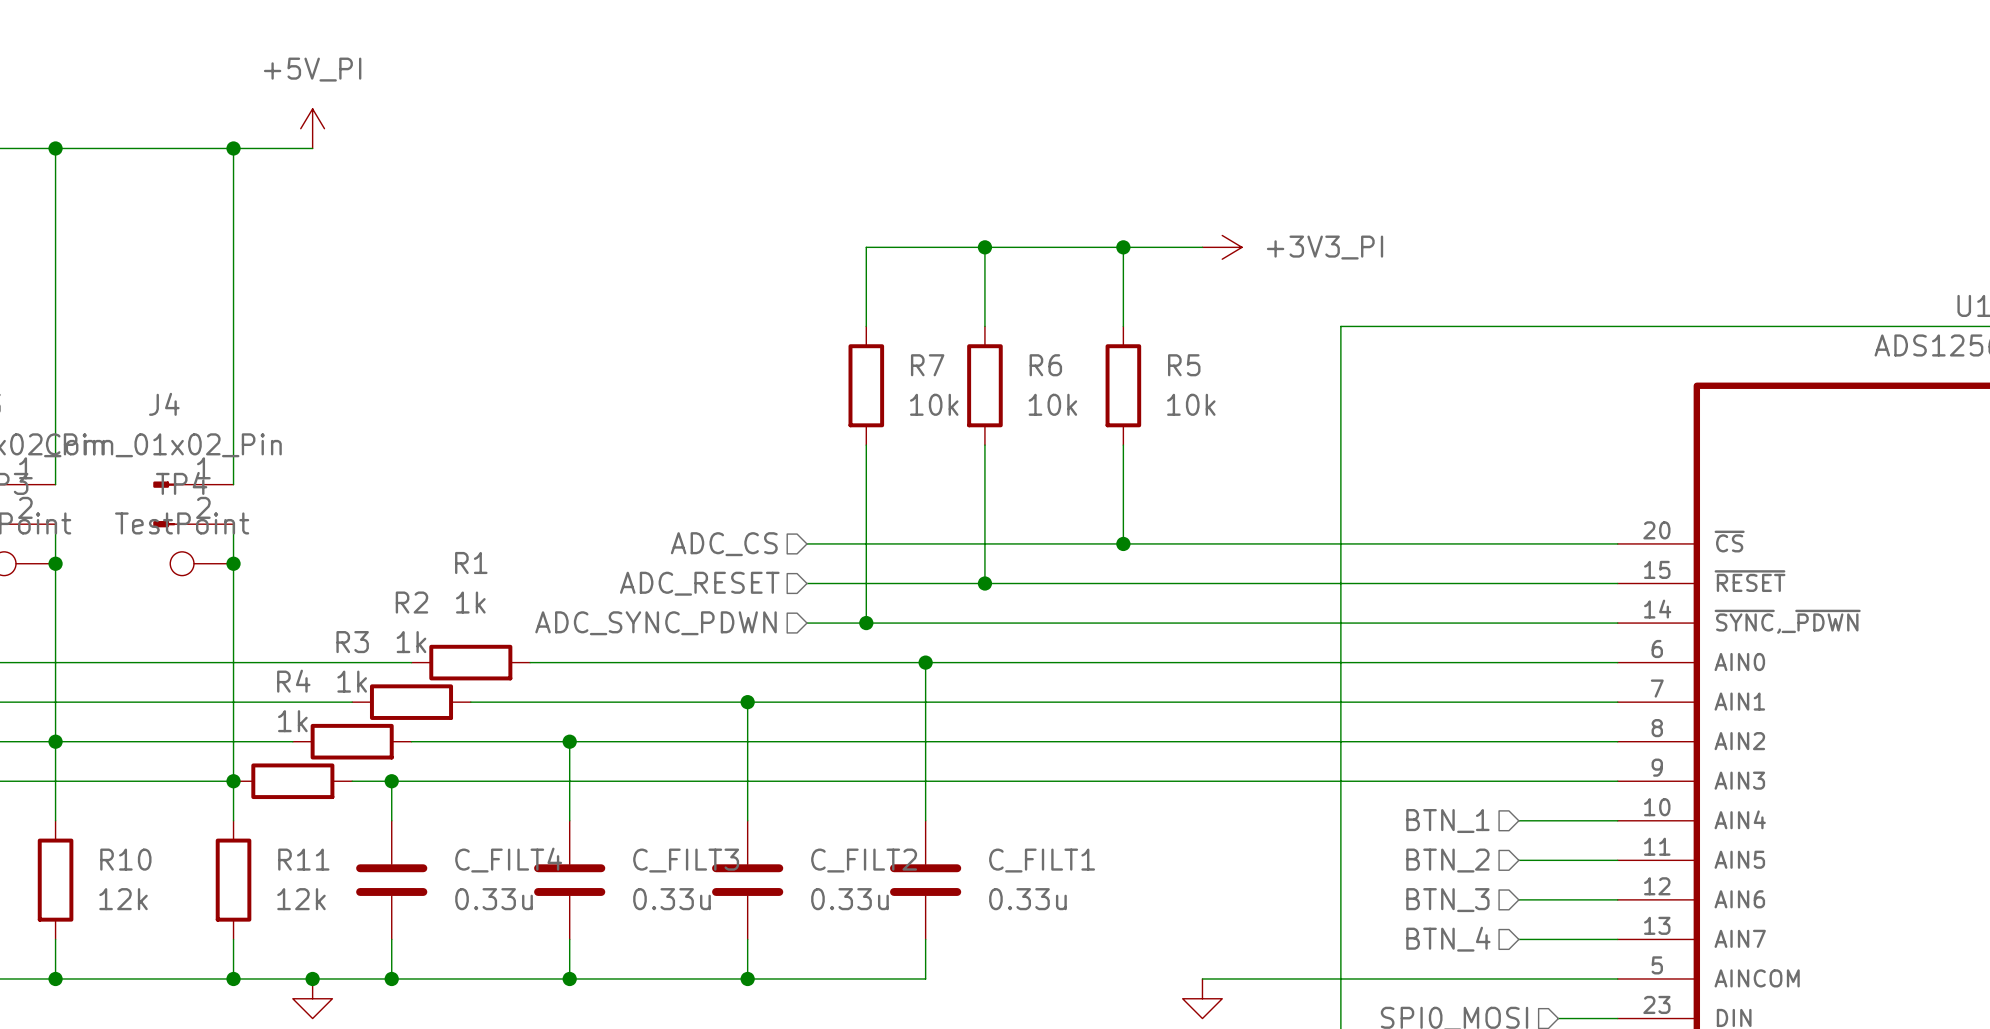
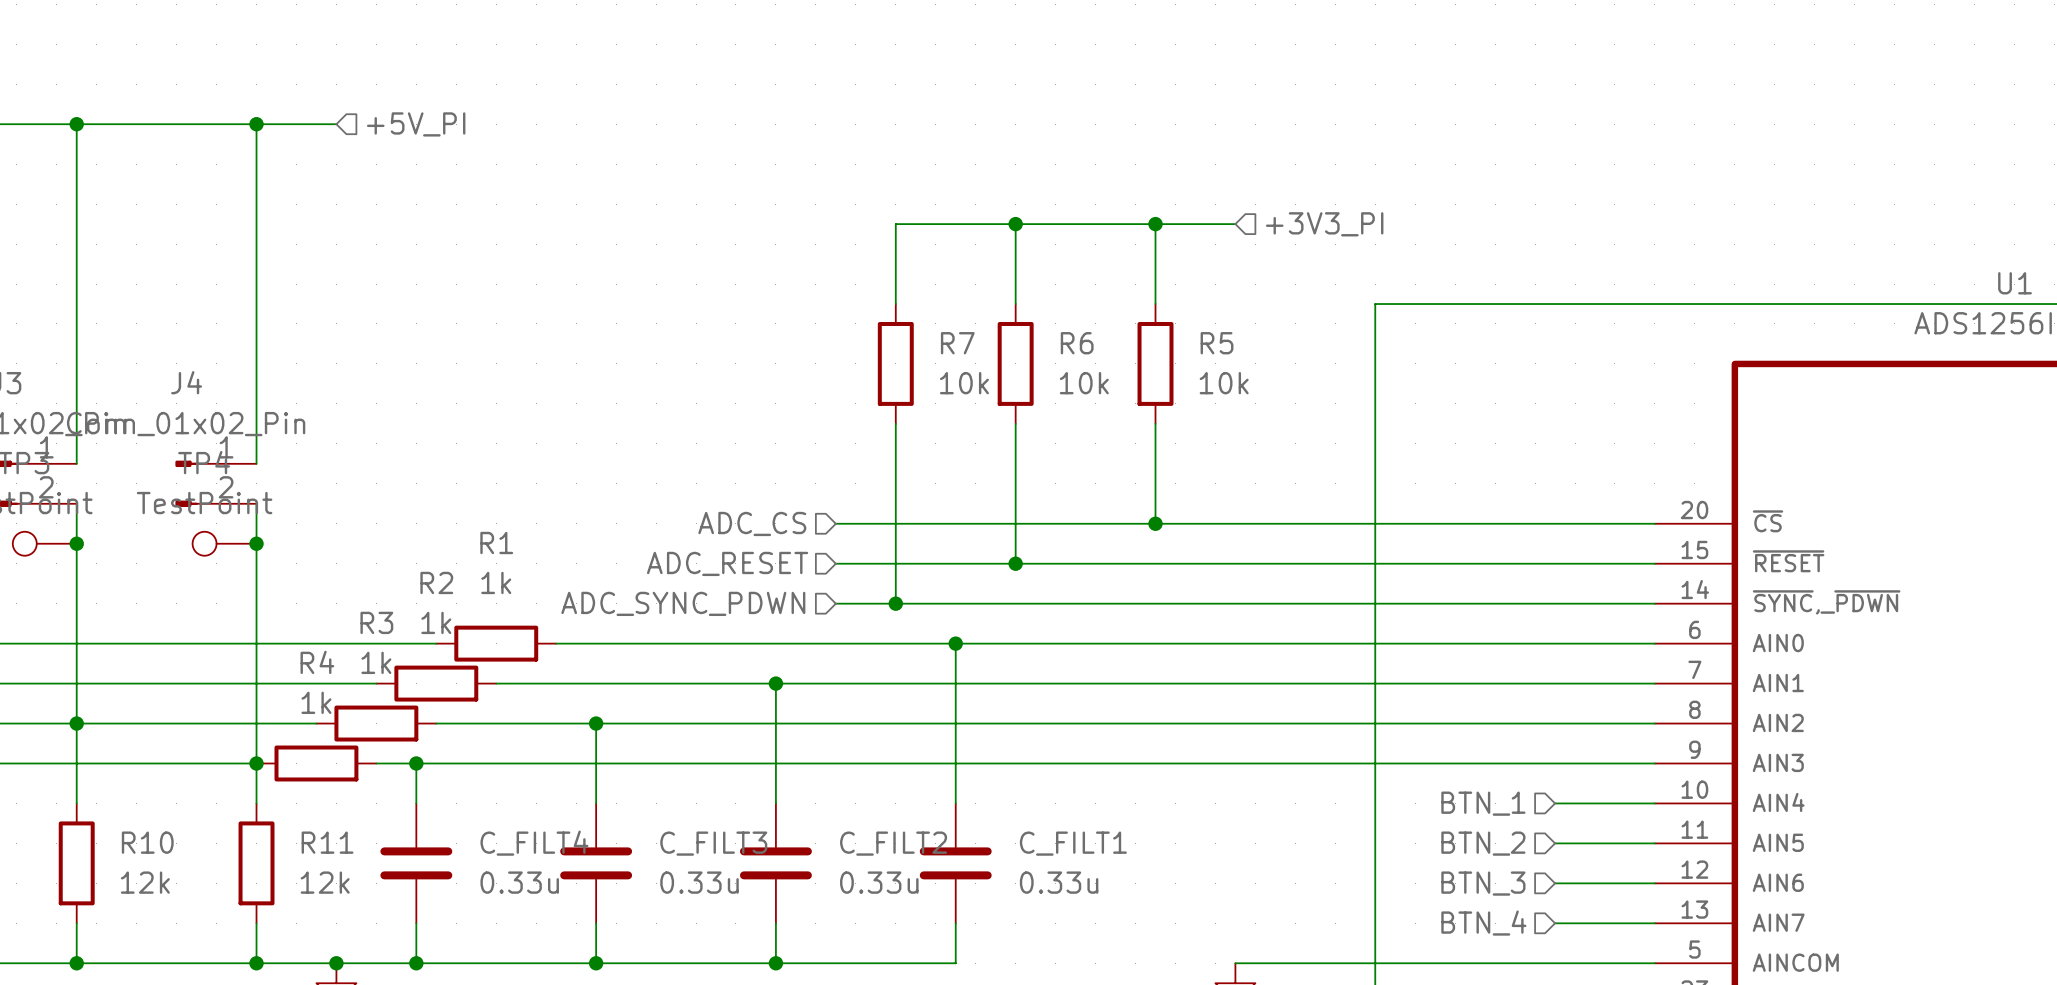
power symbol: +5V_PI (312, 128) -> none
hierarchical label: none -> +5V_PI (416, 124)
power symbol: +3V3_PI (1222, 247) -> none
hierarchical label: none -> +3V3_PI (1324, 224)

